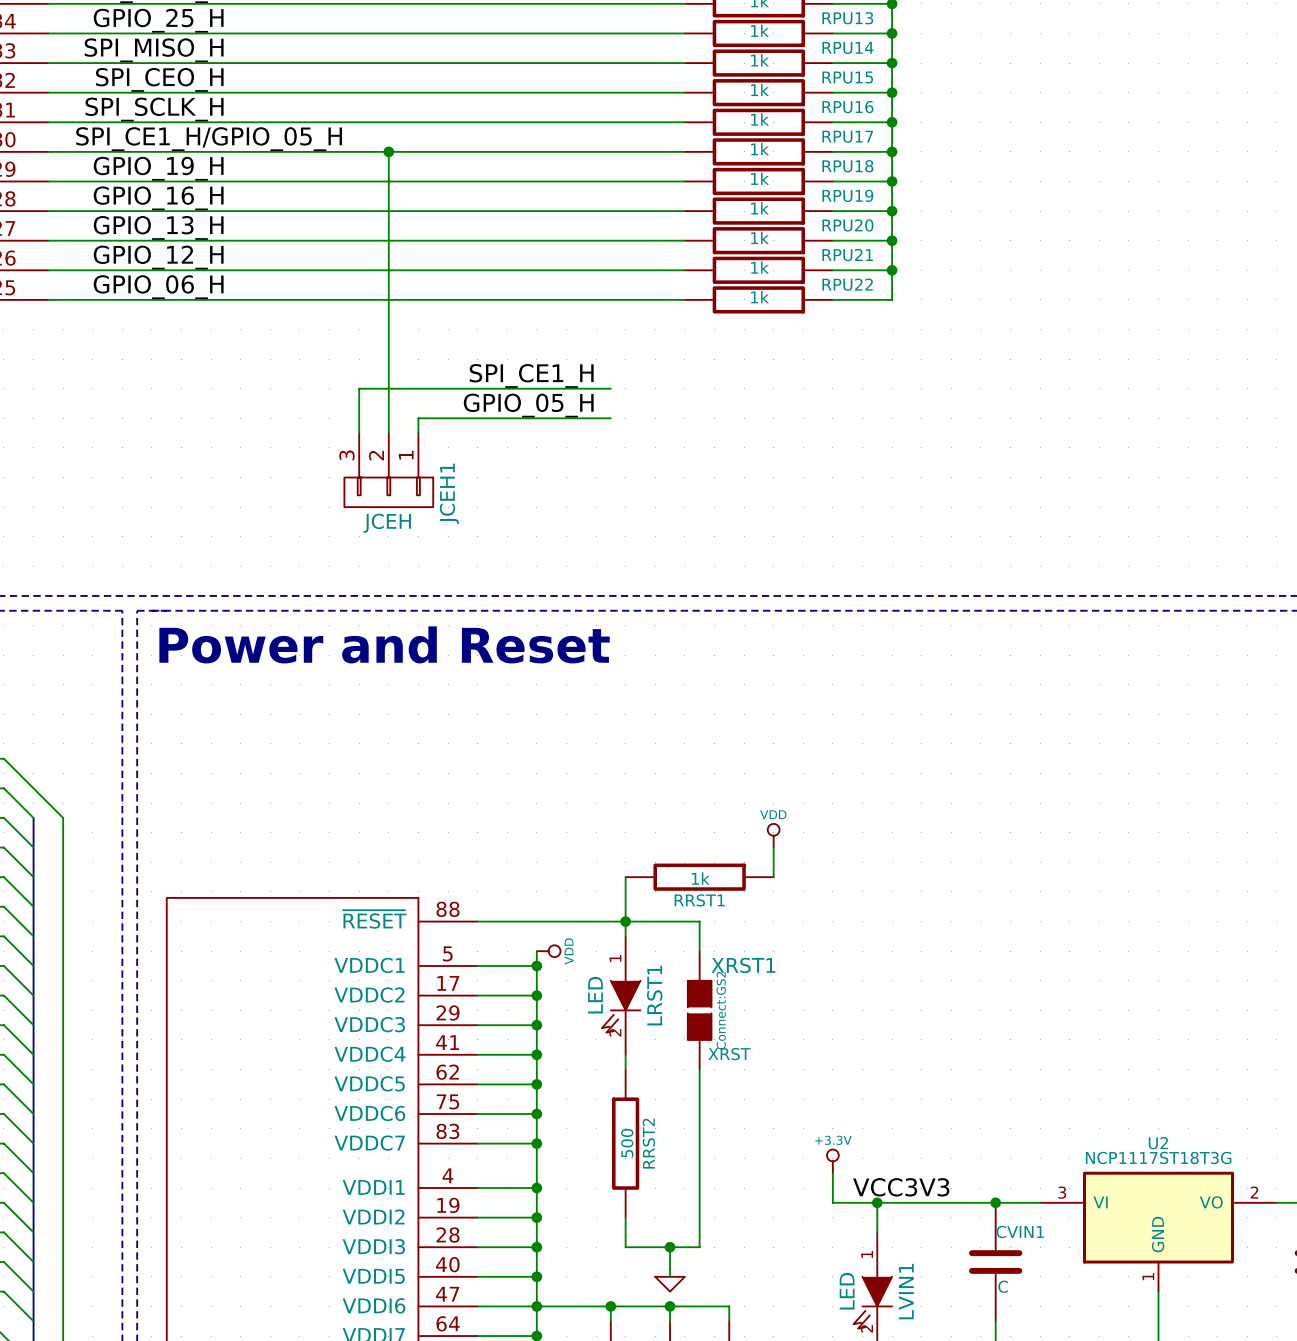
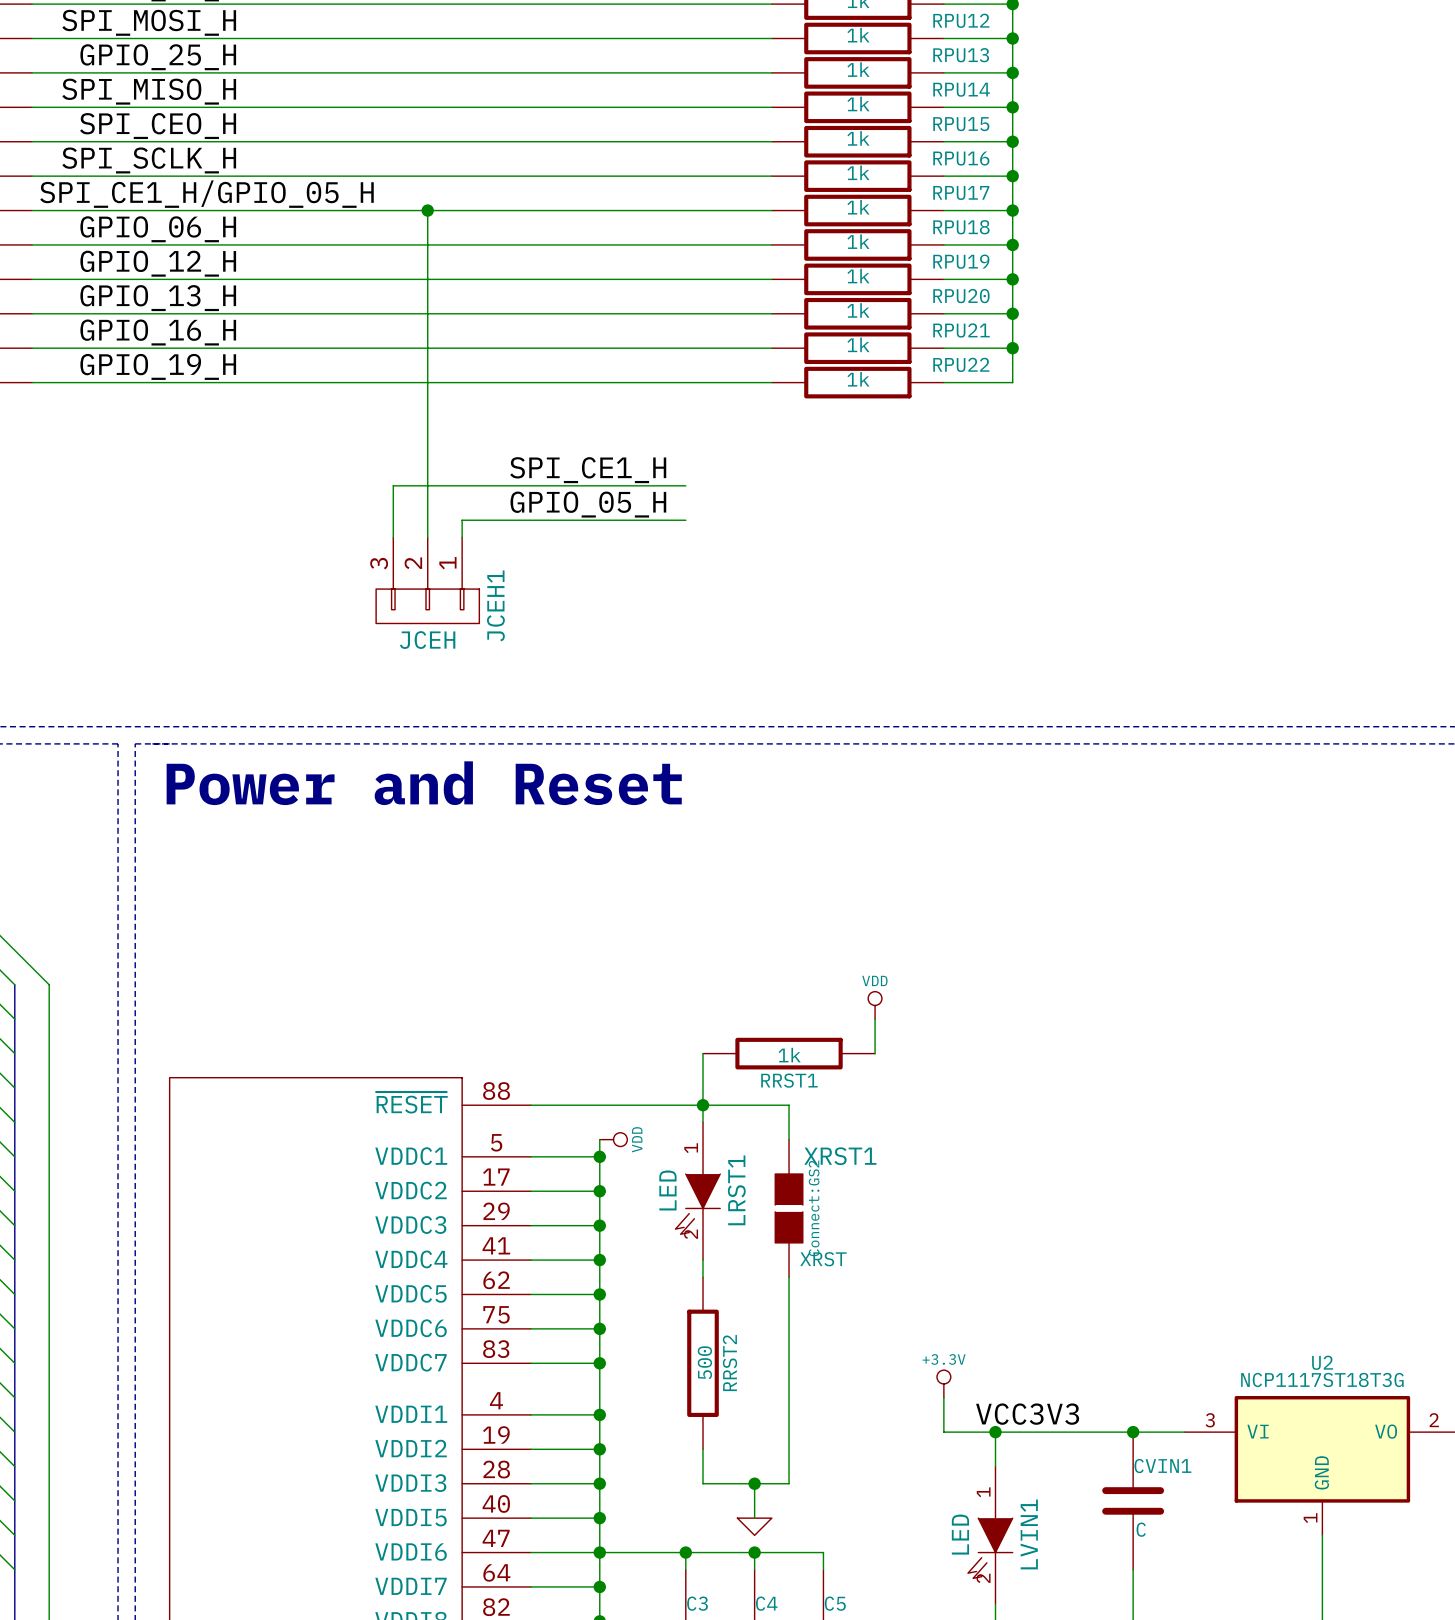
label: GPIO_19_H (158, 168) -> GPIO_06_H (158, 229)
label: GPIO_16_H (158, 198) -> GPIO_12_H (158, 263)
label: GPIO_12_H (158, 257) -> GPIO_16_H (158, 332)
label: GPIO_06_H (158, 287) -> GPIO_19_H (158, 366)

